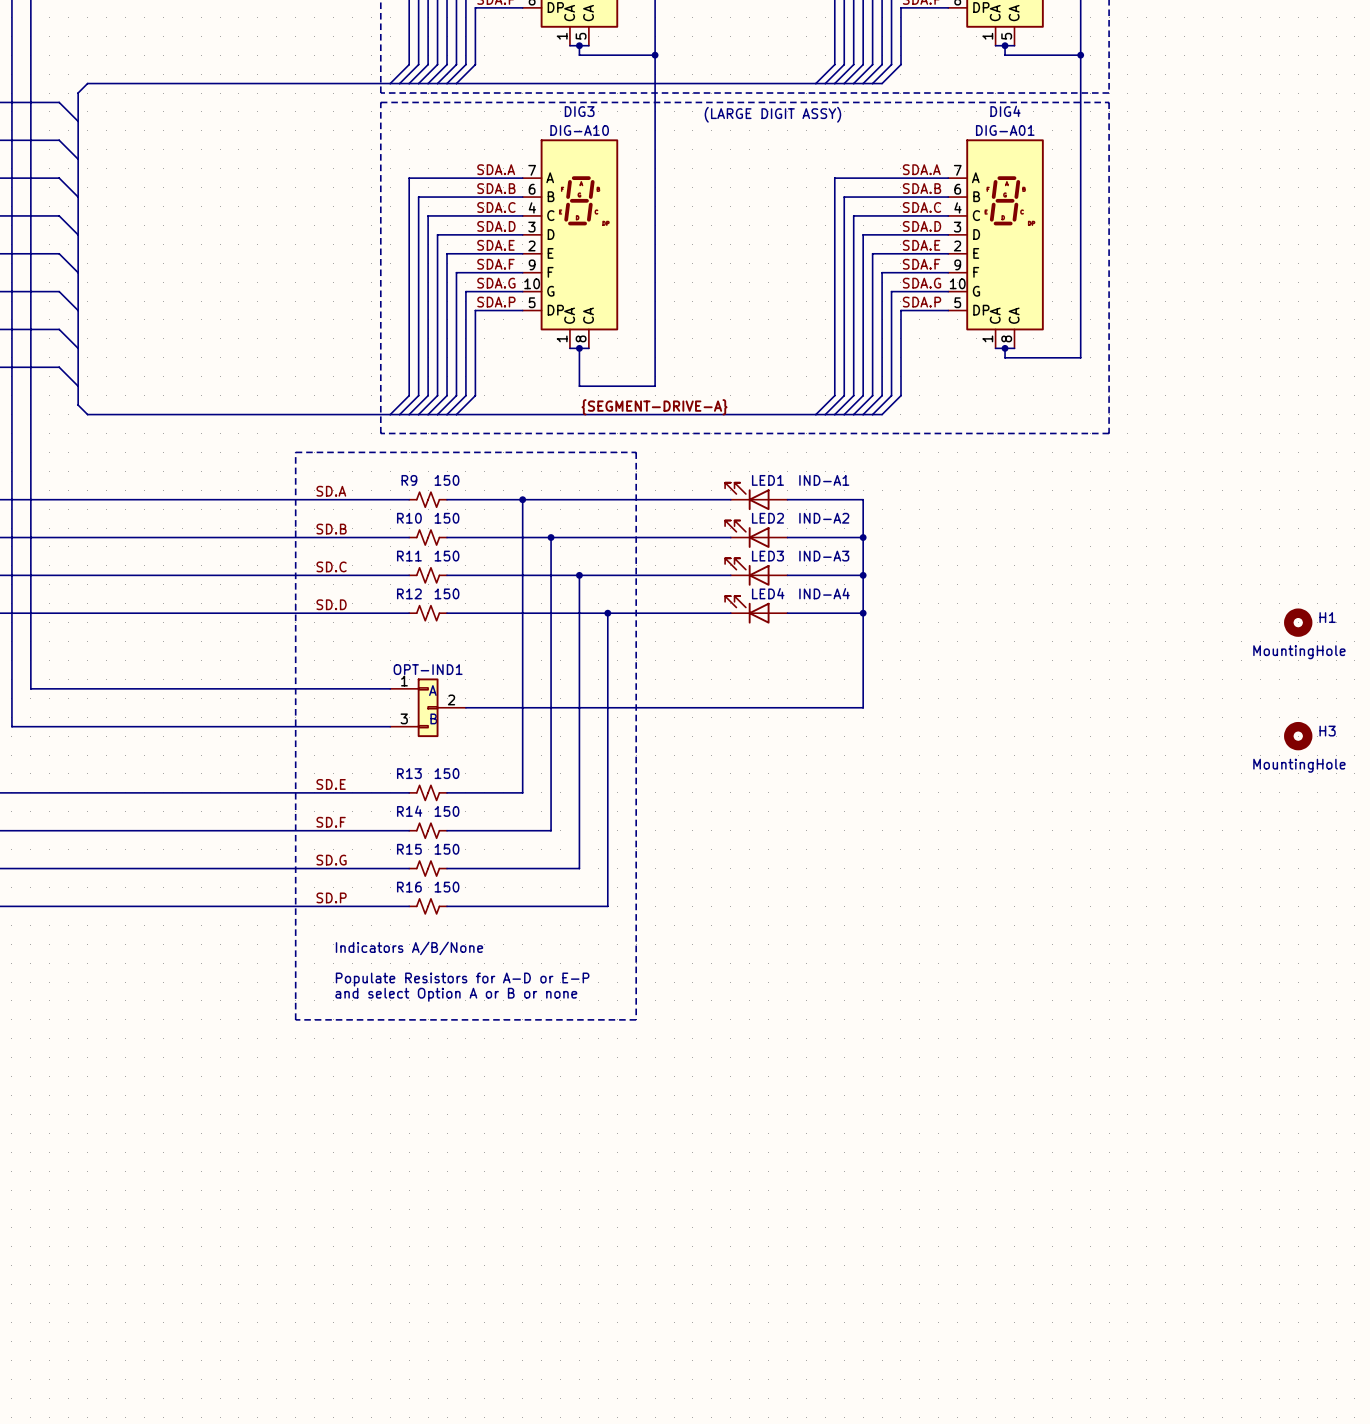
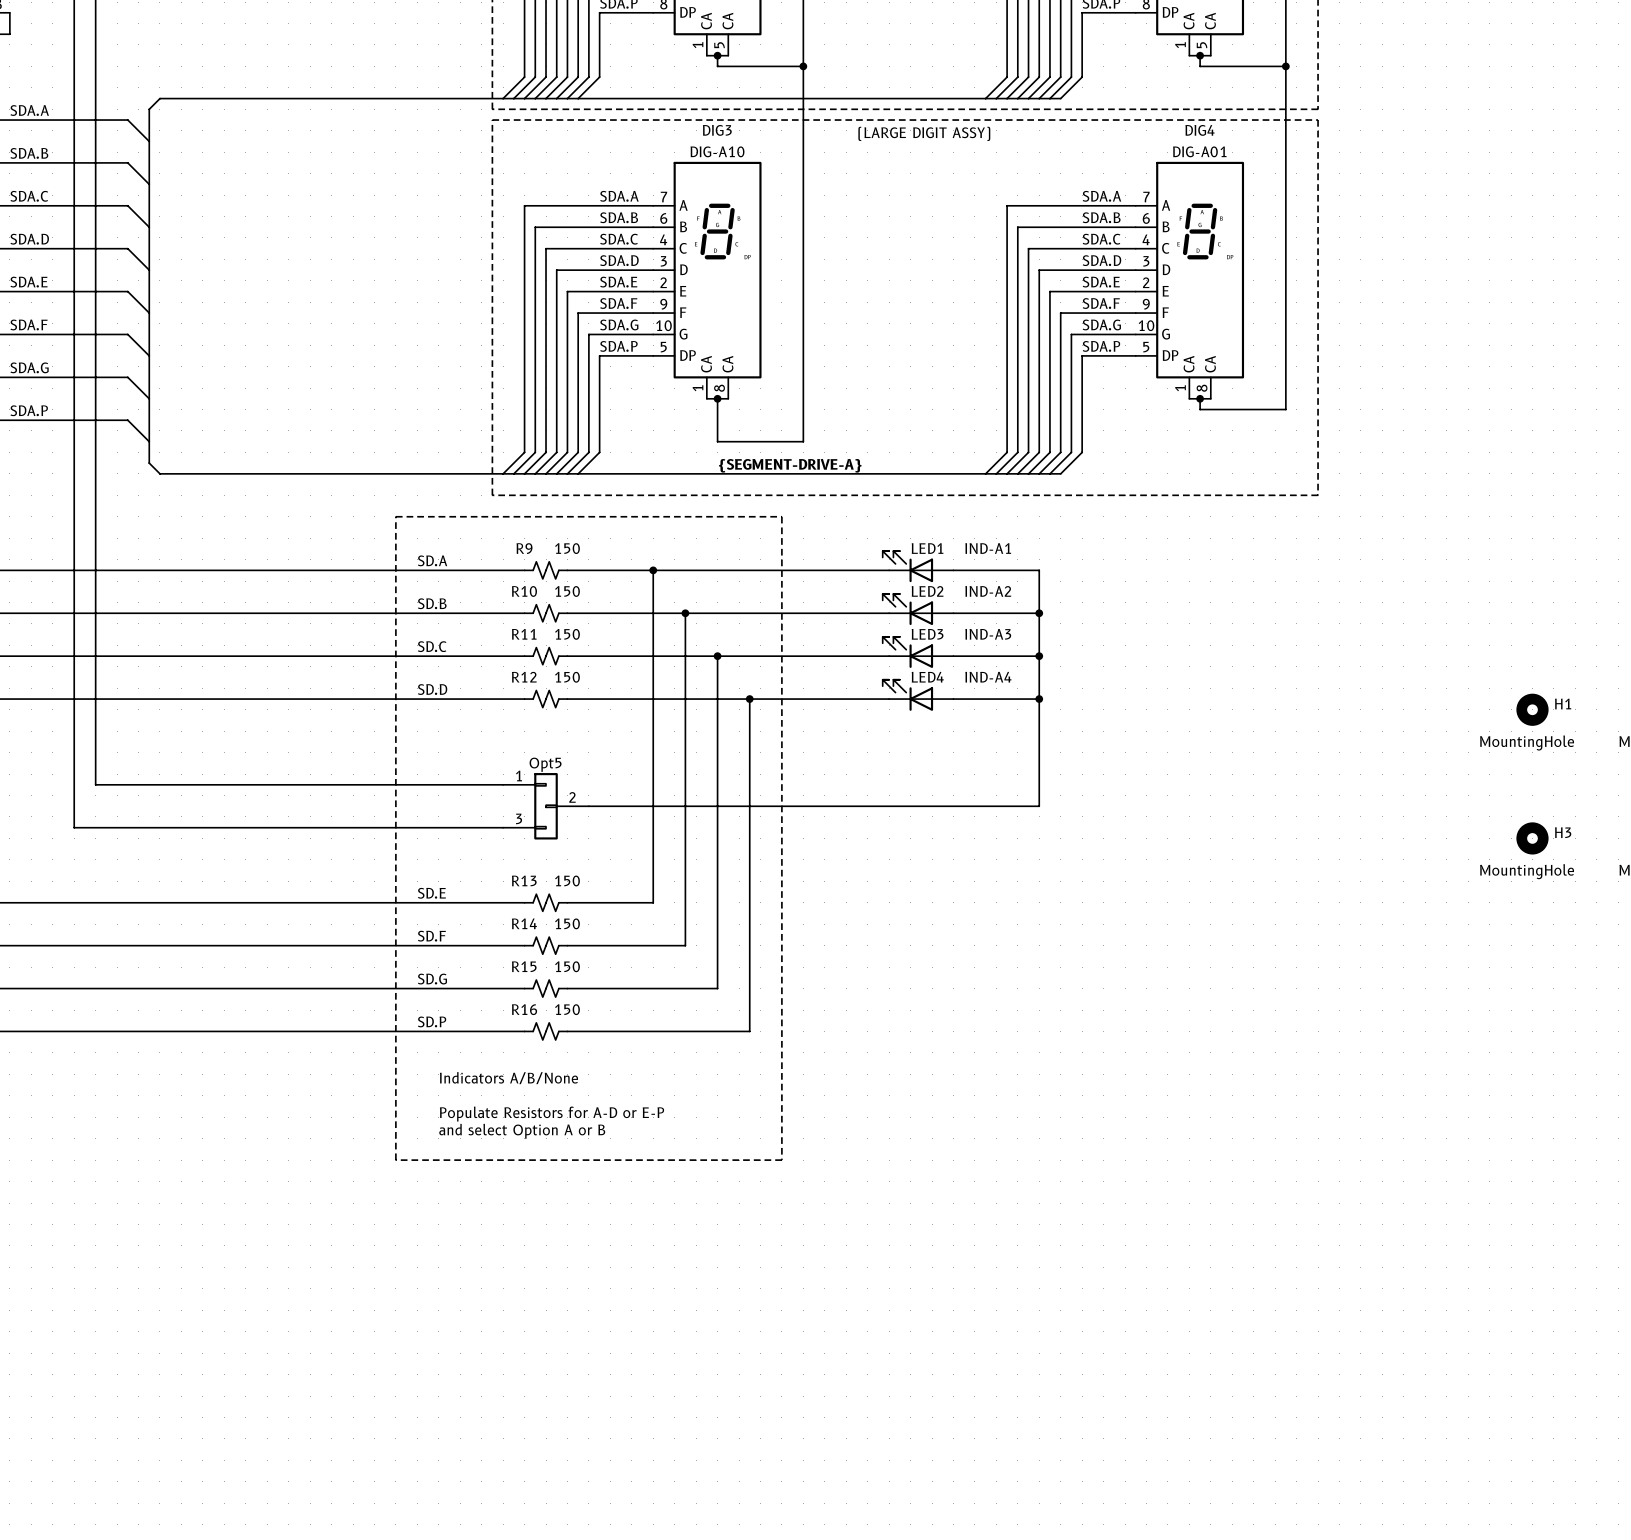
OPT-IND1 name: OPT-IND1 (428, 669) -> Opt5 (545, 764)
text: A (432, 690) -> none
text: B (433, 718) -> none
text: and select Option A or B or none (456, 994) -> and select Option A or B (522, 1131)

